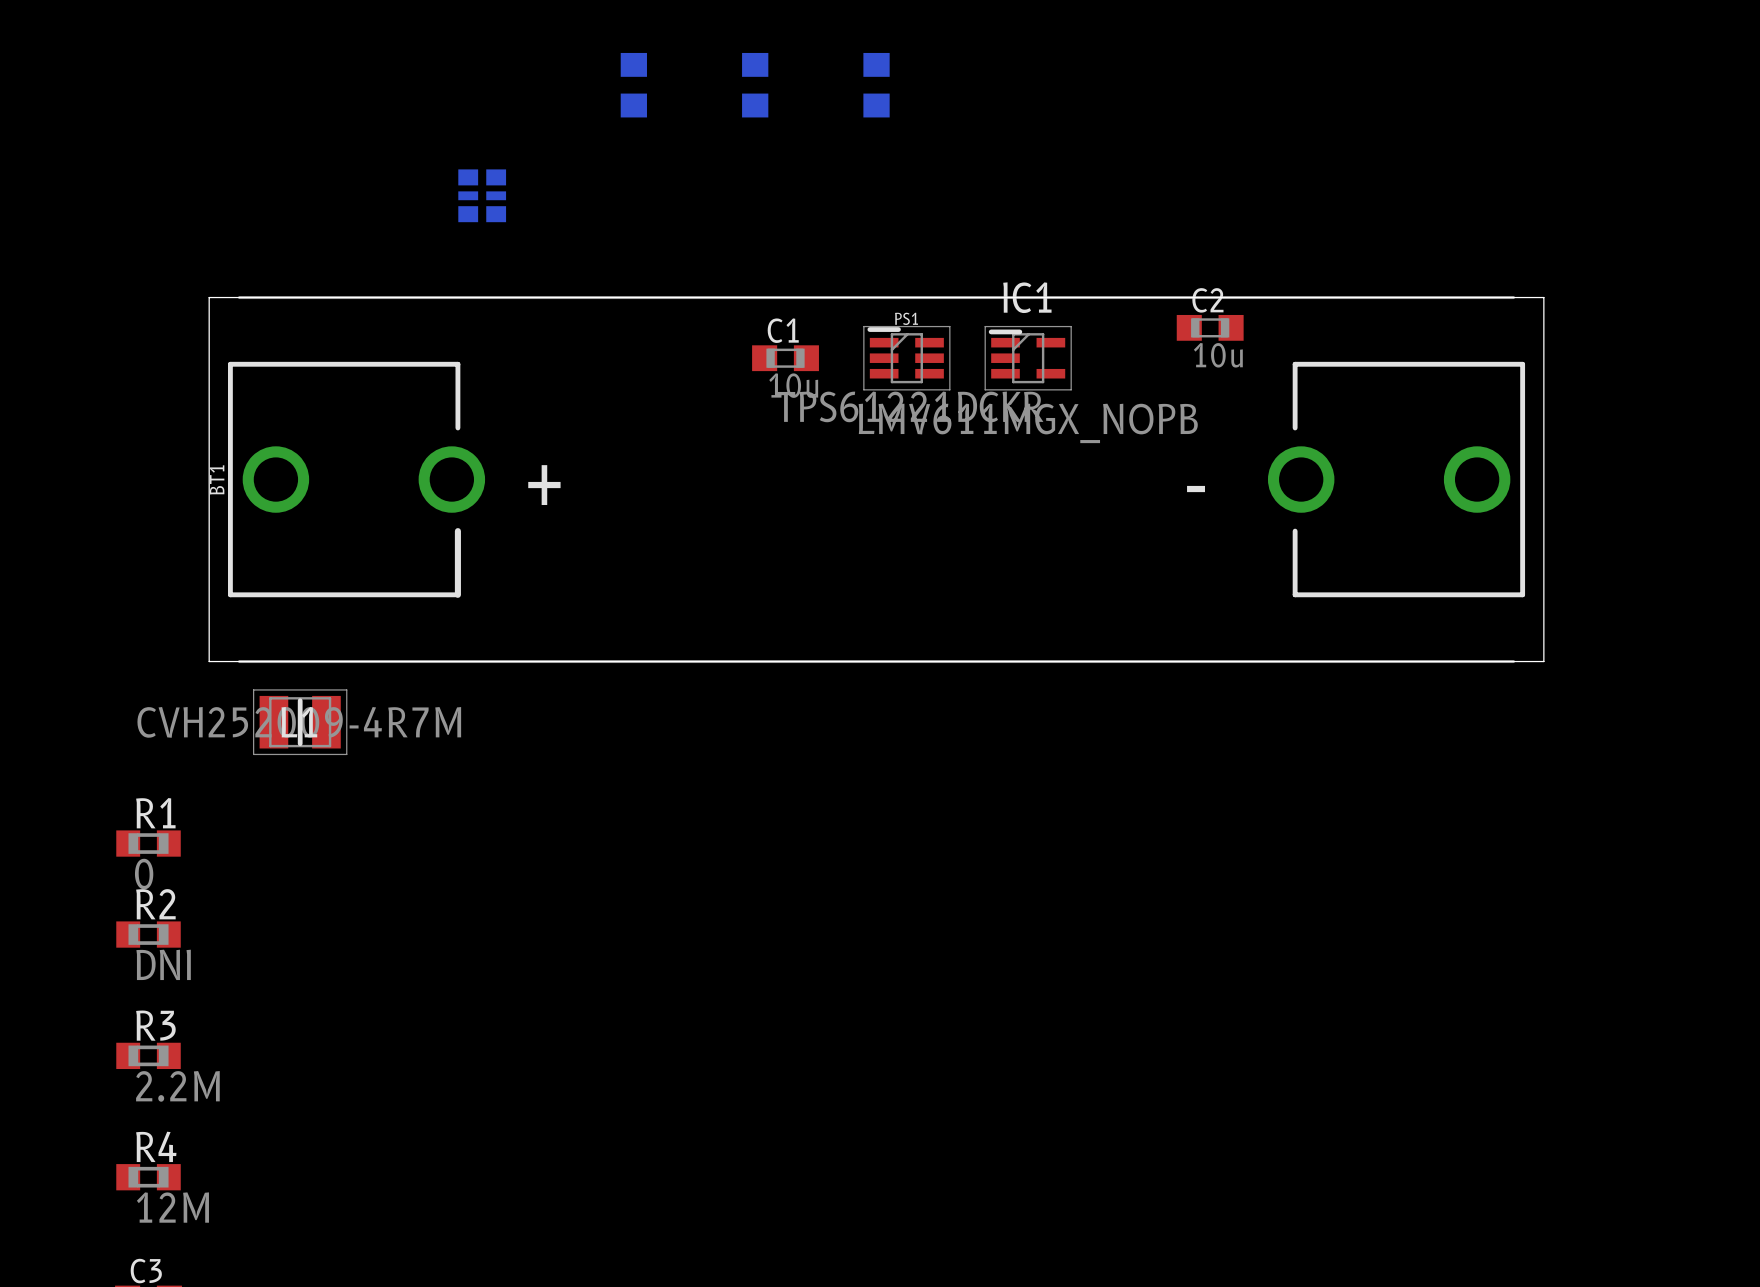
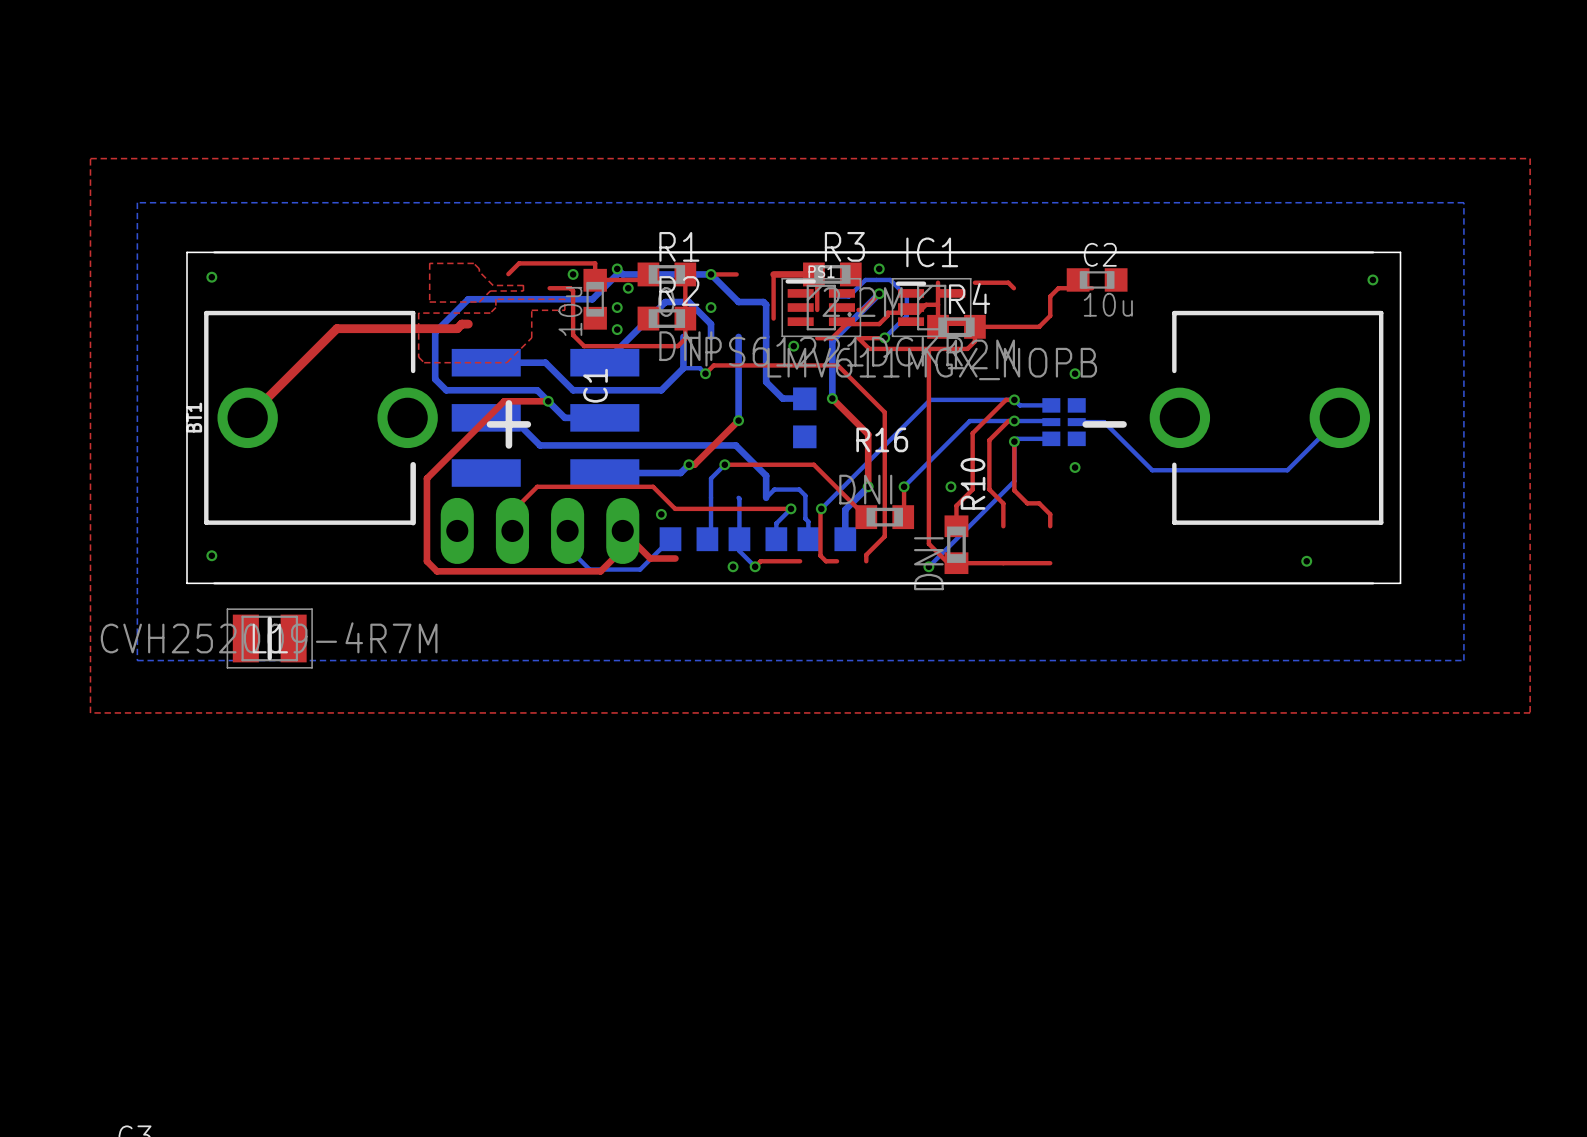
part: (633, 85) -> none
part: (755, 85) -> none
R10 side: bottom (876, 85) -> top (956, 544)
top zone outline: none -> (90, 158) (1530, 158) (1530, 712) (90, 712) (90, 158)
part: (482, 195) -> none
bottom zone outline: none -> (137, 202) (137, 660) (1463, 660) (1463, 202) (137, 202)
top zone outline: none -> (429, 263) (473, 263) (493, 285) (523, 285) (523, 290) (490, 290) (479, 302) (429, 302) (429, 263)
via: none -> (617, 268)
via: none -> (879, 268)
top track: none -> (508, 274) (519, 263) (595, 263) (595, 280)
via: none -> (573, 274)
top track: none -> (648, 274) (642, 279) (595, 279)
top track: none -> (685, 274) (685, 338) (677, 346) (584, 346) (573, 335) (573, 290) (570, 288) (549, 288)
top track: none -> (711, 274) (736, 274)
via: none -> (711, 274)
via: none -> (211, 277)
via: none -> (1372, 279)
C1 name position: C1 (783, 330) -> C1 (595, 385)
top track: none -> (938, 282) (938, 326)
top track: none -> (974, 282) (1008, 282) (1013, 288)
via: none -> (628, 288)
top track: none -> (1092, 288) (1058, 288) (1050, 296) (1050, 315) (1039, 326) (974, 326) (974, 341) (967, 348) (869, 348) (858, 338) (884, 337)
bottom track: none -> (879, 293) (832, 340) (832, 398)
top track: none -> (879, 293) (863, 309) (858, 309)
via: none -> (879, 293)
bottom track: none -> (837, 296) (848, 296) (865, 279) (890, 279) (906, 296) (906, 315) (884, 337)
top zone outline: none -> (495, 299) (495, 307) (490, 313) (418, 313) (418, 357) (424, 362) (506, 362) (531, 337) (531, 310) (564, 310) (564, 299) (495, 299)
top track: none -> (938, 304) (926, 304) (918, 312) (887, 312)
via: none -> (617, 307)
C1 rotation: 0° (785, 358) -> 90° clockwise (595, 299)
C1 position: (785, 358) -> (595, 299)
via: none -> (711, 307)
top track: none -> (817, 309) (817, 277) (813, 274) (773, 274) (773, 318)
top track: none -> (887, 313) (887, 315) (879, 324) (846, 324) (832, 338) (817, 338)
top track: none -> (468, 324) (461, 324) (457, 328) (336, 328) (247, 417)
via: none -> (617, 329)
bottom track: none -> (683, 336) (683, 368)
bottom track: none -> (711, 336) (711, 324) (688, 302) (665, 302) (604, 362)
bottom track: none -> (738, 336) (738, 420)
via: none -> (884, 337)
via: none -> (793, 346)
top track: none -> (928, 348) (928, 543) (948, 563) (1050, 563)
bottom track: none -> (486, 362) (545, 362) (573, 390) (661, 390) (683, 368)
bottom track: none -> (683, 368) (699, 368) (705, 373)
top track: none -> (705, 373) (713, 365) (837, 365) (884, 412) (884, 536) (866, 554) (866, 561)
via: none -> (705, 373)
via: none -> (1075, 373)
bottom track: none -> (804, 398) (782, 398) (766, 382) (766, 304) (763, 302) (738, 302) (711, 274) (622, 274) (617, 268) (617, 274) (592, 299) (468, 299) (435, 332) (435, 379) (446, 390) (537, 390) (564, 417) (604, 417)
top track: none -> (832, 398) (868, 434) (868, 486)
via: none -> (832, 398)
top track: none -> (1014, 399) (1006, 399) (972, 433) (972, 489) (956, 505) (956, 526)
via: none -> (1014, 399)
top track: none -> (548, 401) (504, 401) (426, 478) (426, 561) (437, 571) (600, 571) (622, 549) (622, 530) (650, 558) (675, 558)
via: none -> (548, 401)
bottom track: none -> (1051, 405) (1019, 405) (1014, 399) (930, 399) (821, 508)
bottom track: none -> (486, 417) (512, 417) (540, 445) (735, 445) (766, 475) (766, 497) (774, 489) (799, 489) (805, 495) (805, 518) (808, 521) (808, 539)
part: none -> (545, 417)
part: none -> (804, 417)
bottom track: none -> (1339, 417) (1287, 470) (1152, 470) (1104, 422) (1076, 422)
top track: none -> (738, 420) (694, 464) (688, 464)
via: none -> (738, 420)
top track: none -> (1014, 421) (1008, 421) (989, 440) (989, 489) (1003, 503) (1003, 526)
via: none -> (1014, 421)
bottom track: none -> (1051, 422) (969, 421) (904, 486)
part: none -> (1064, 422)
bottom track: none -> (1051, 438) (1017, 438) (1014, 441) (1014, 481) (928, 566)
top track: none -> (1014, 441) (1014, 490) (1027, 503) (1039, 503) (1050, 514) (1050, 526)
via: none -> (1014, 441)
bottom track: none -> (688, 464) (680, 473) (604, 473)
via: none -> (688, 464)
bottom track: none -> (724, 464) (711, 478) (711, 535) (707, 539)
top track: none -> (724, 464) (813, 464) (866, 517)
via: none -> (724, 464)
via: none -> (1075, 467)
bottom track: none -> (868, 486) (845, 509) (845, 539)
via: none -> (868, 486)
top track: none -> (904, 486) (903, 517)
via: none -> (904, 486)
via: none -> (950, 486)
bottom track: none -> (738, 497) (739, 551) (755, 566)
bottom track: none -> (790, 508) (776, 523) (776, 539)
top track: none -> (790, 508) (675, 508) (653, 486) (537, 486) (512, 511) (512, 530)
via: none -> (790, 508)
top track: none -> (821, 508) (820, 555) (826, 561) (837, 561)
via: none -> (821, 508)
via: none -> (661, 514)
R16: none -> DNI (884, 517)
part: none -> (540, 530)
bottom track: none -> (567, 530) (567, 547) (589, 569) (640, 569) (670, 539)
part: none -> (688, 539)
part: none -> (757, 539)
part: none -> (826, 539)
via: none -> (211, 555)
top track: none -> (800, 561) (760, 561) (755, 566)
via: none -> (1306, 561)
via: none -> (733, 566)
via: none -> (755, 566)
via: none -> (928, 566)
R1 position: (148, 843) -> (666, 274)
R2 position: (148, 934) -> (666, 318)
R3 position: (148, 1055) -> (832, 274)
R4 position: (148, 1177) -> (956, 326)

